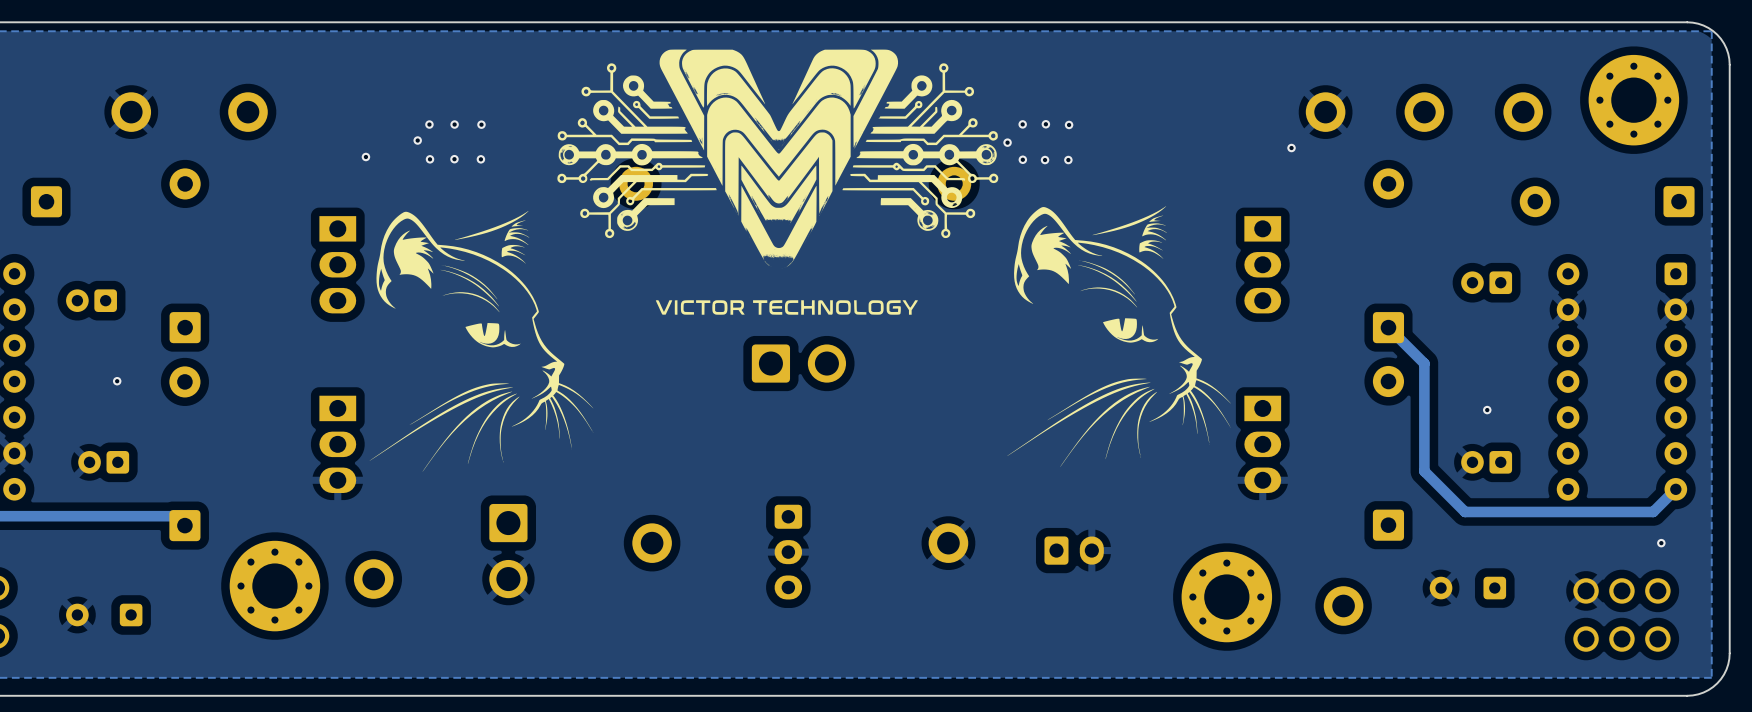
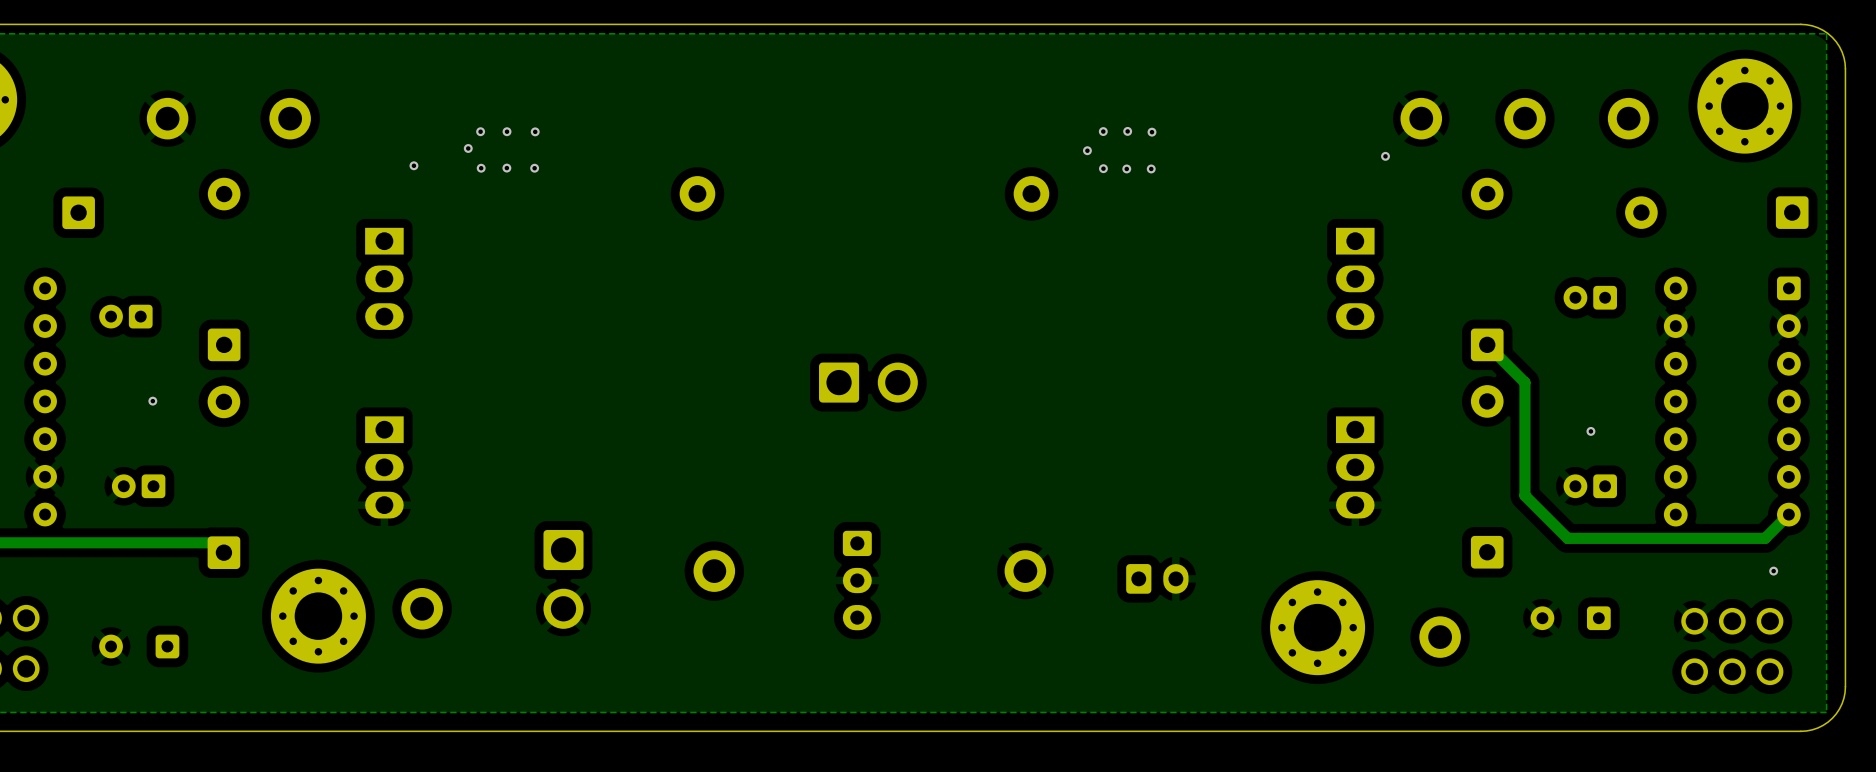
drawing: [369, 49, 1231, 472] -> none

